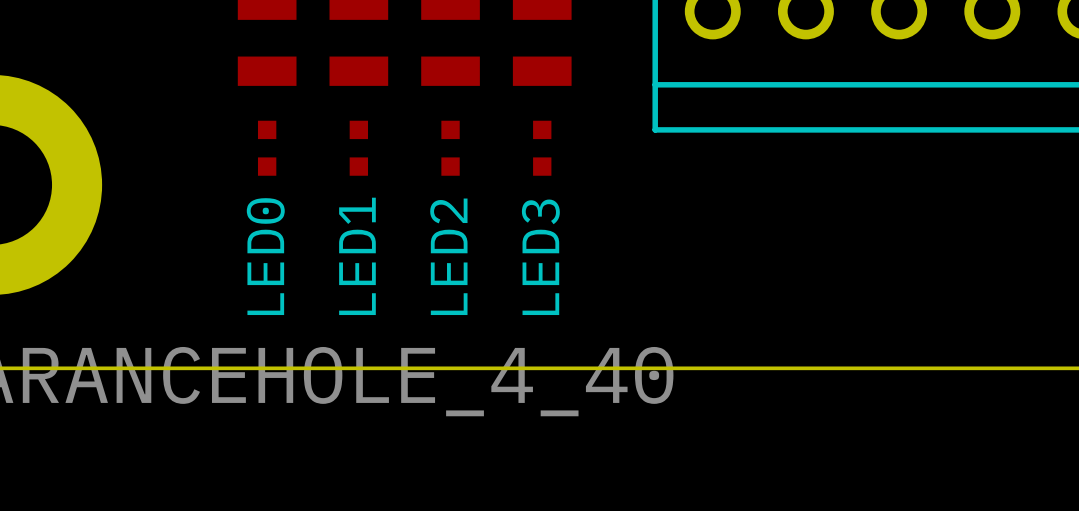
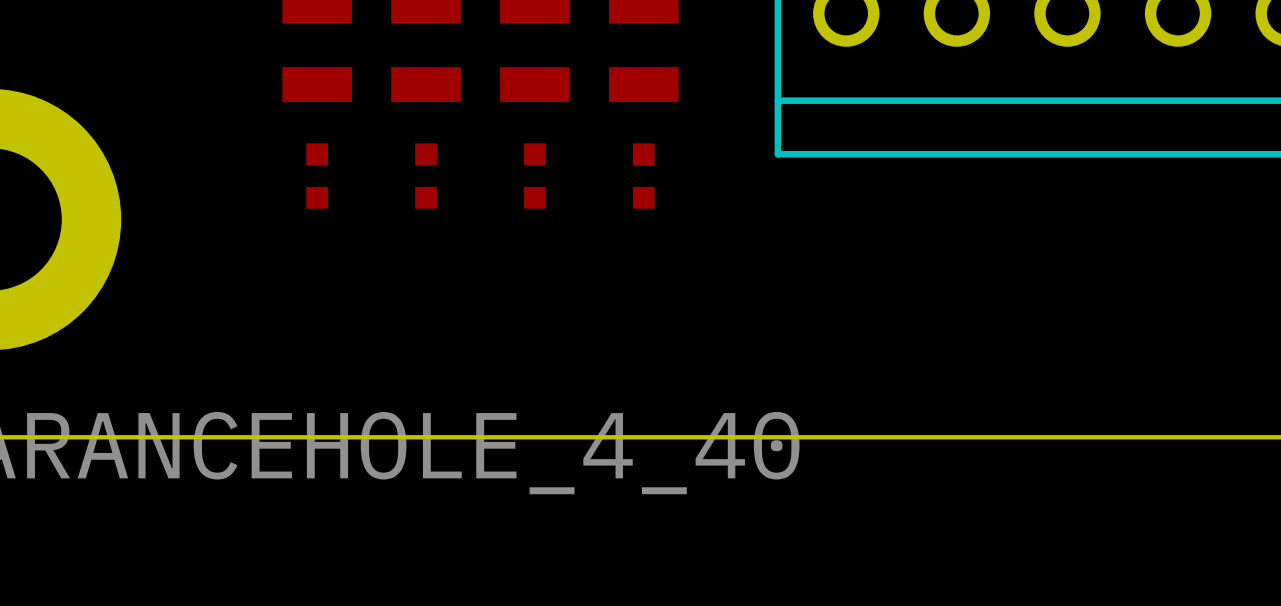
text: LED0 (265, 256) -> none
text: LED1 (357, 256) -> none
text: LED2 (448, 256) -> none
text: LED3 (540, 257) -> none

